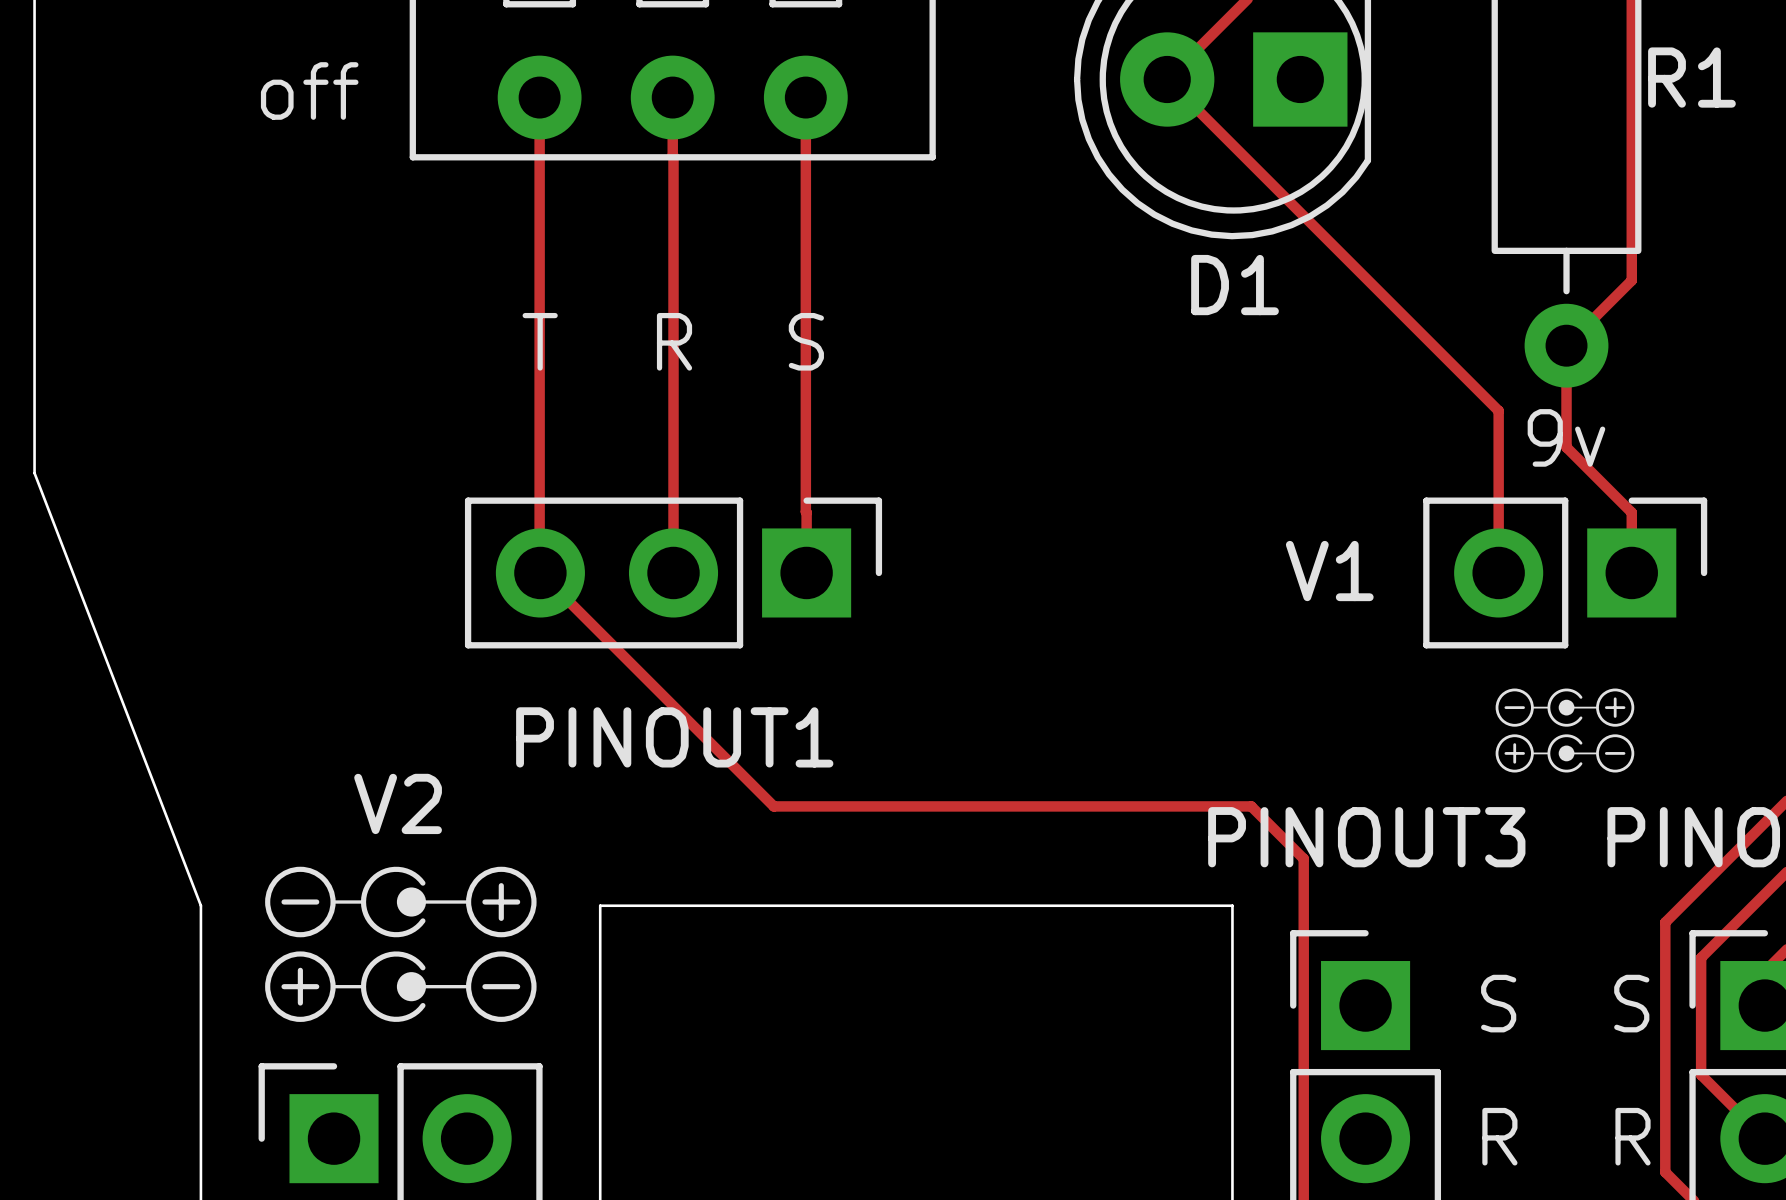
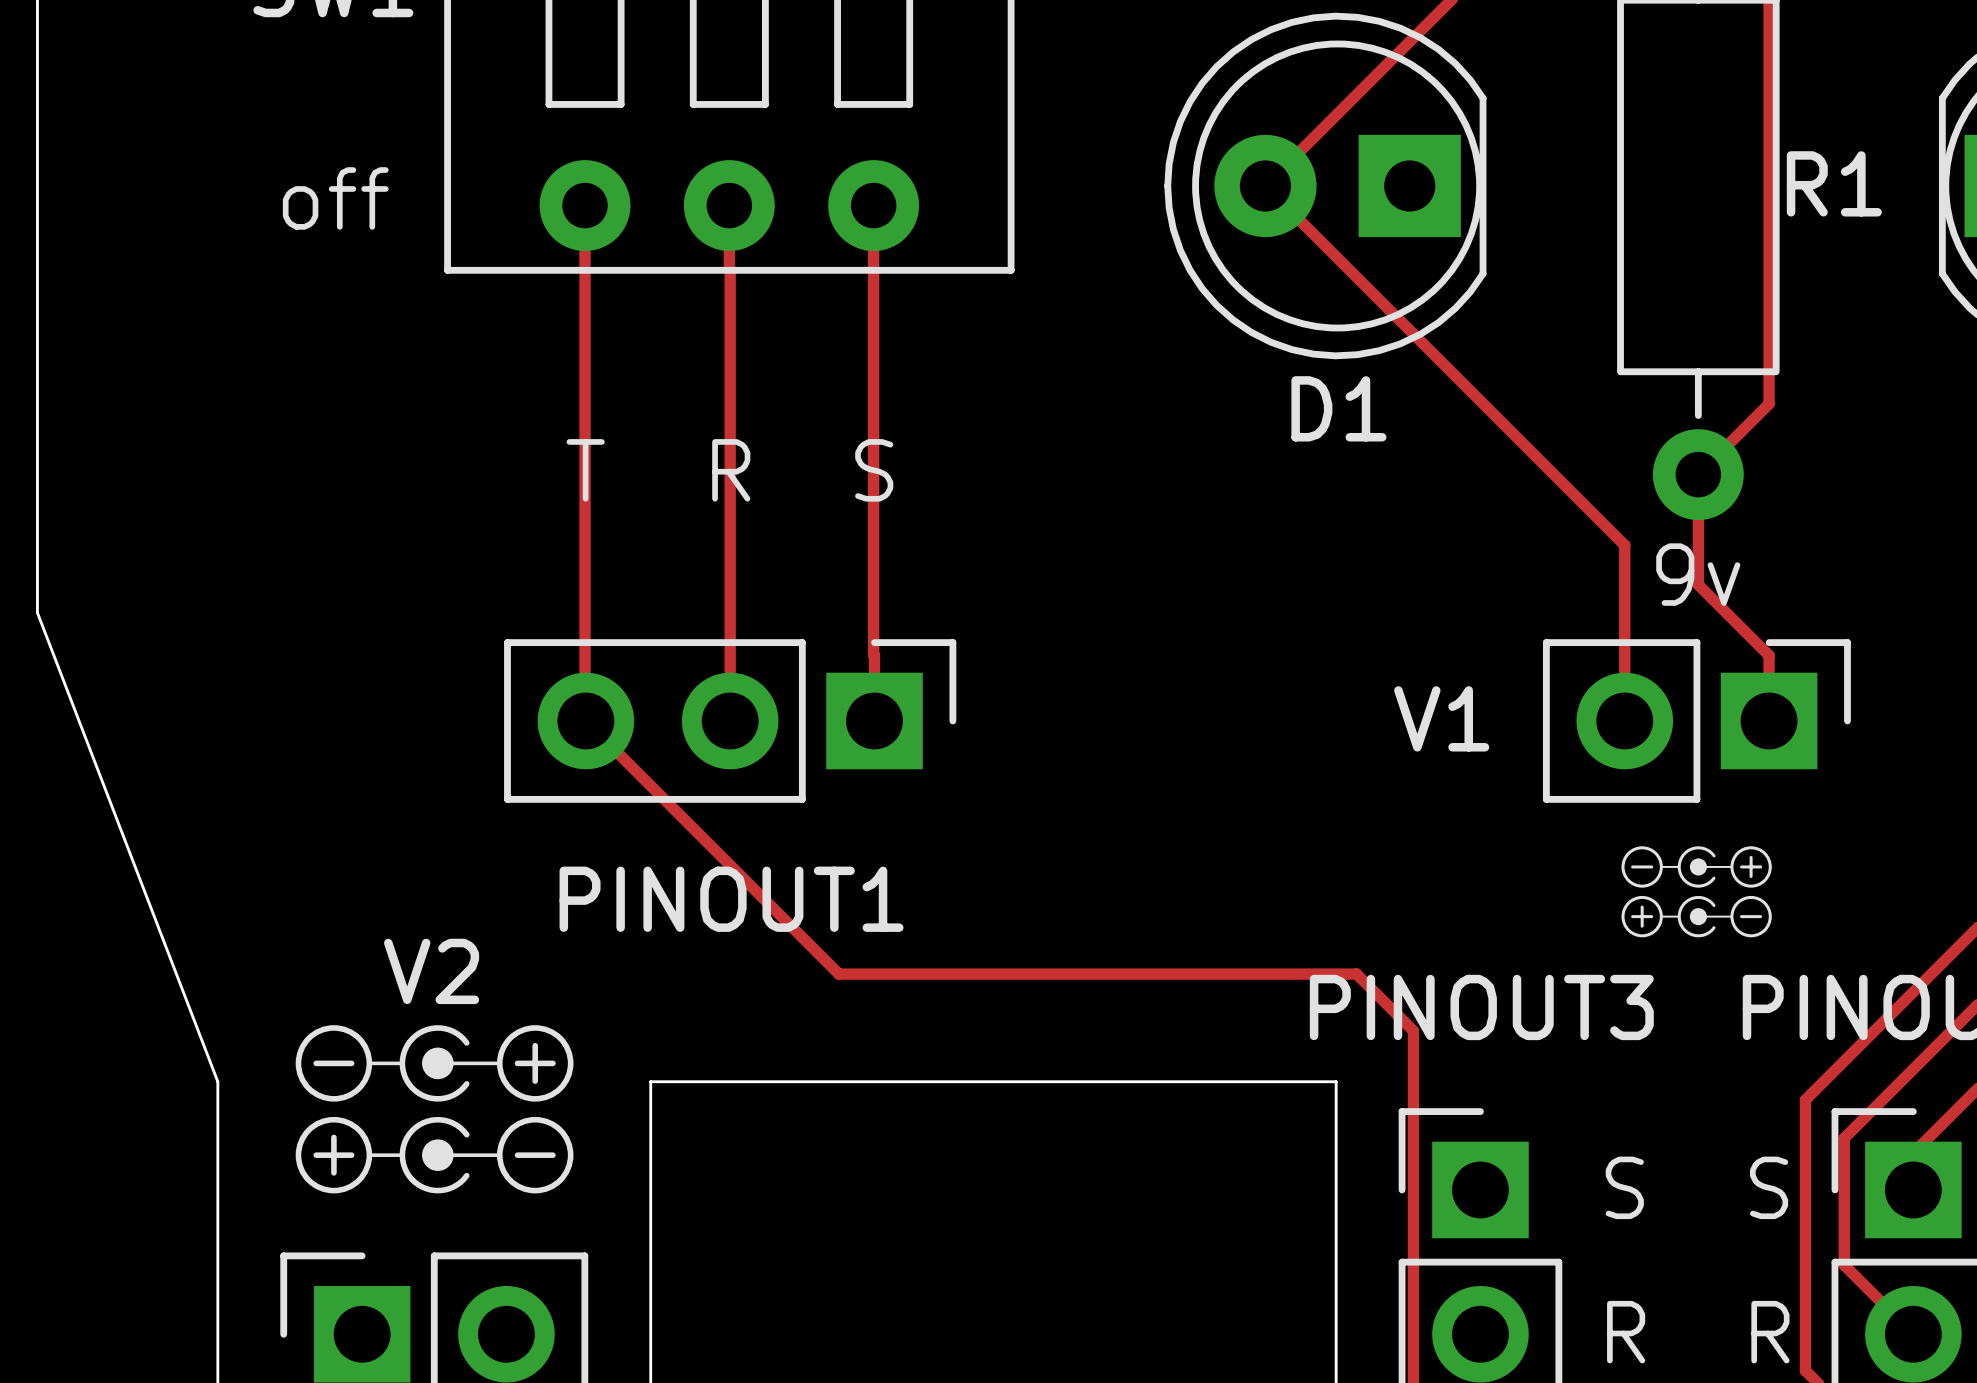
line: (422, 883) (417, 877) (406, 871) (398, 869) (386, 870) (378, 874) (369, 882) (365, 889) (363, 902) (365, 914) (369, 921) (378, 929) (386, 933) (394, 934) (406, 933) (417, 926) (422, 920) -> (466, 1042) (457, 1033) (449, 1029) (435, 1027) (427, 1029) (415, 1035) (409, 1042) (404, 1050) (402, 1063) (404, 1076) (409, 1084) (415, 1090) (427, 1097) (435, 1098) (449, 1097) (457, 1093) (466, 1083)
line: (501, 885) (501, 918) -> (535, 1045) (535, 1081)
line: (284, 902) (316, 902) -> (316, 1063) (351, 1063)
drawing position: (300, 902) -> (333, 1063)
line: (333, 902) (363, 902) -> (369, 1063) (402, 1063)
drawing position: (411, 902) -> (437, 1063)
line: (423, 902) (468, 902) -> (450, 1063) (499, 1063)
line: (484, 902) (517, 902) -> (517, 1063) (552, 1063)
drawing position: (501, 902) -> (535, 1063)
line: (422, 967) (414, 959) (406, 955) (398, 954) (386, 955) (378, 958) (369, 967) (365, 974) (363, 986) (364, 994) (369, 1005) (378, 1014) (386, 1017) (394, 1019) (406, 1017) (414, 1014) (422, 1005) -> (466, 1134) (460, 1128) (449, 1121) (440, 1119) (427, 1121) (418, 1125) (409, 1134) (404, 1142) (402, 1155) (404, 1168) (409, 1176) (418, 1185) (427, 1188) (435, 1190) (449, 1188) (457, 1184) (466, 1175)
line: (300, 970) (300, 1003) -> (333, 1137) (333, 1172)
line: (284, 986) (316, 986) -> (316, 1155) (351, 1155)
drawing position: (300, 986) -> (333, 1155)
line: (333, 986) (363, 986) -> (369, 1155) (402, 1155)
drawing position: (411, 986) -> (437, 1155)
line: (423, 986) (468, 986) -> (450, 1155) (499, 1155)
line: (484, 986) (517, 986) -> (517, 1155) (552, 1155)
drawing position: (501, 986) -> (535, 1155)

